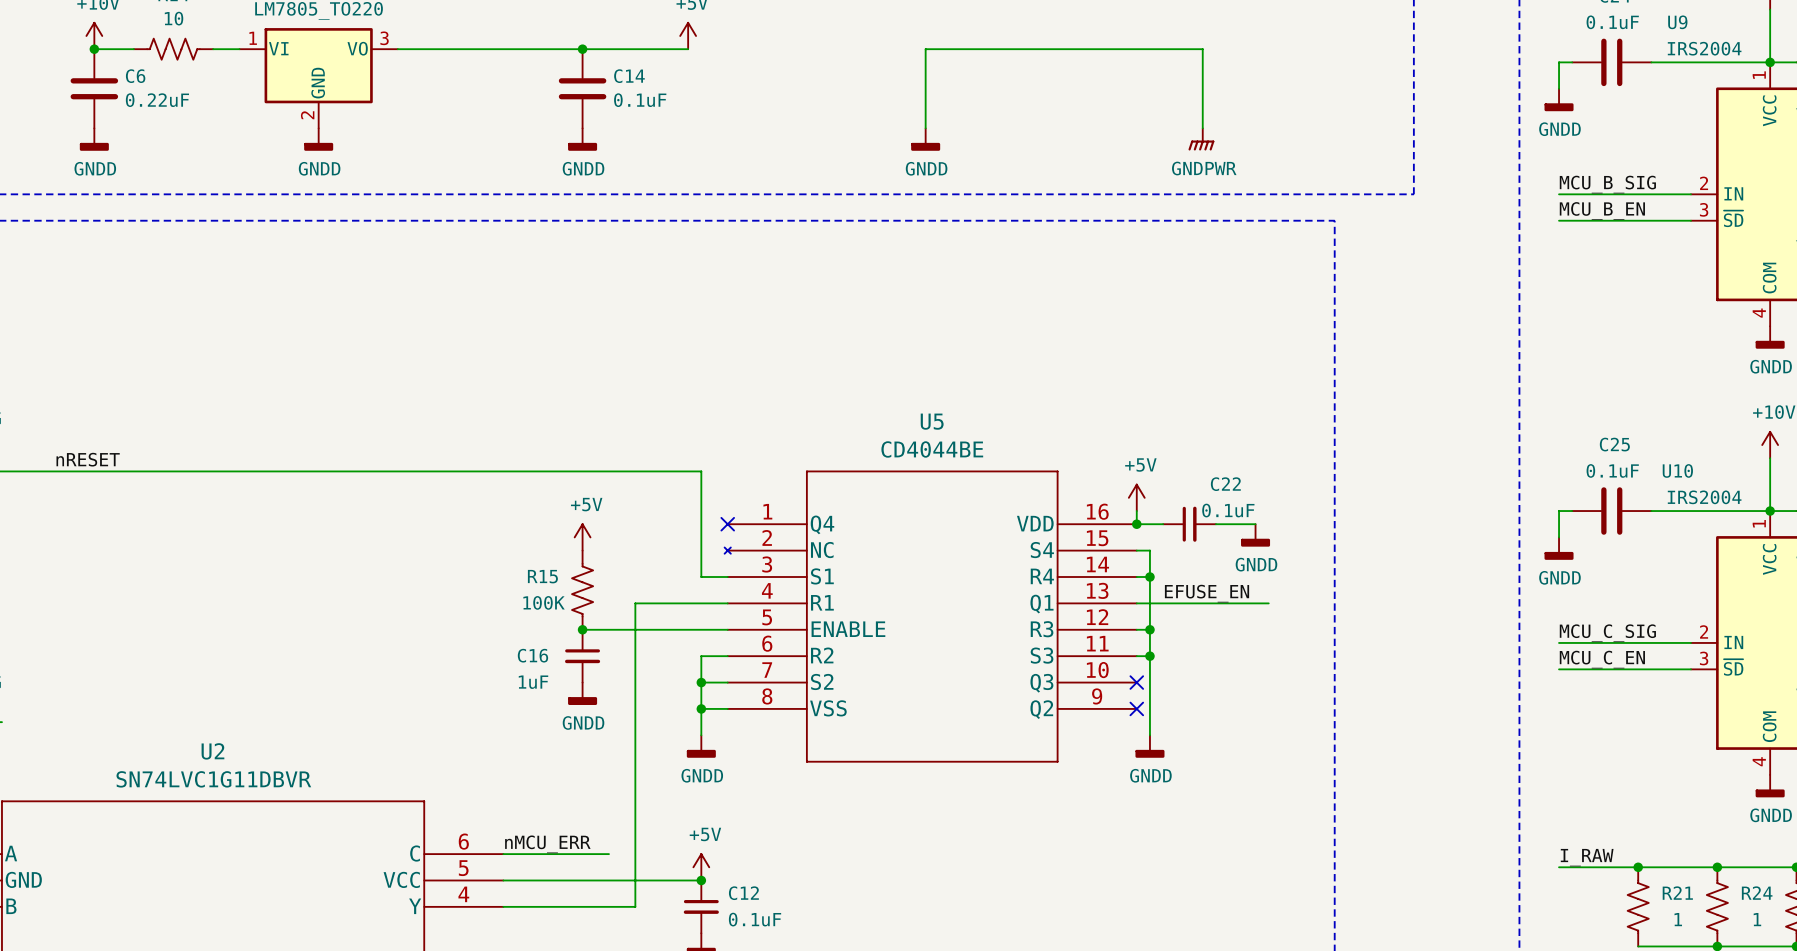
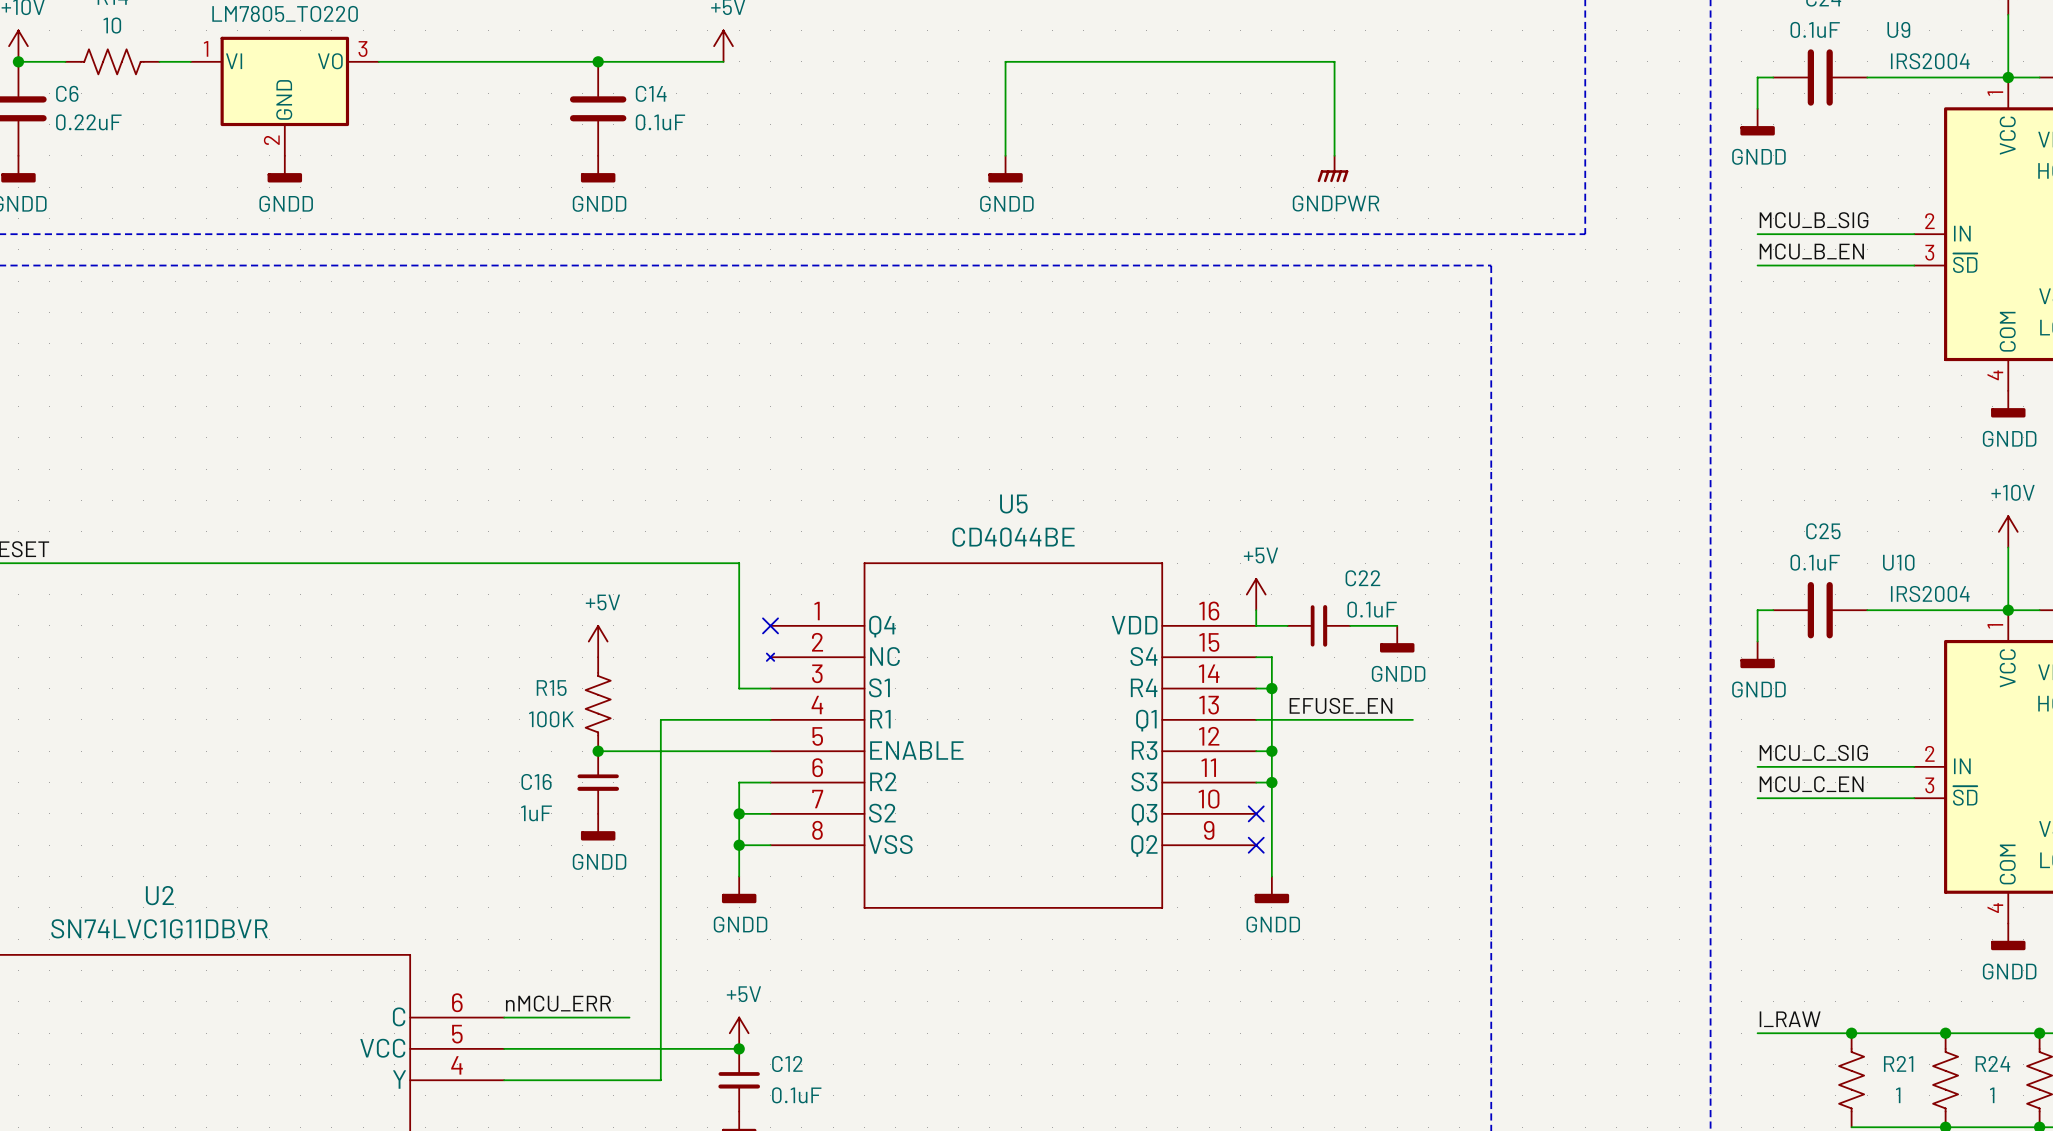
junction: (1136, 524) -> none

